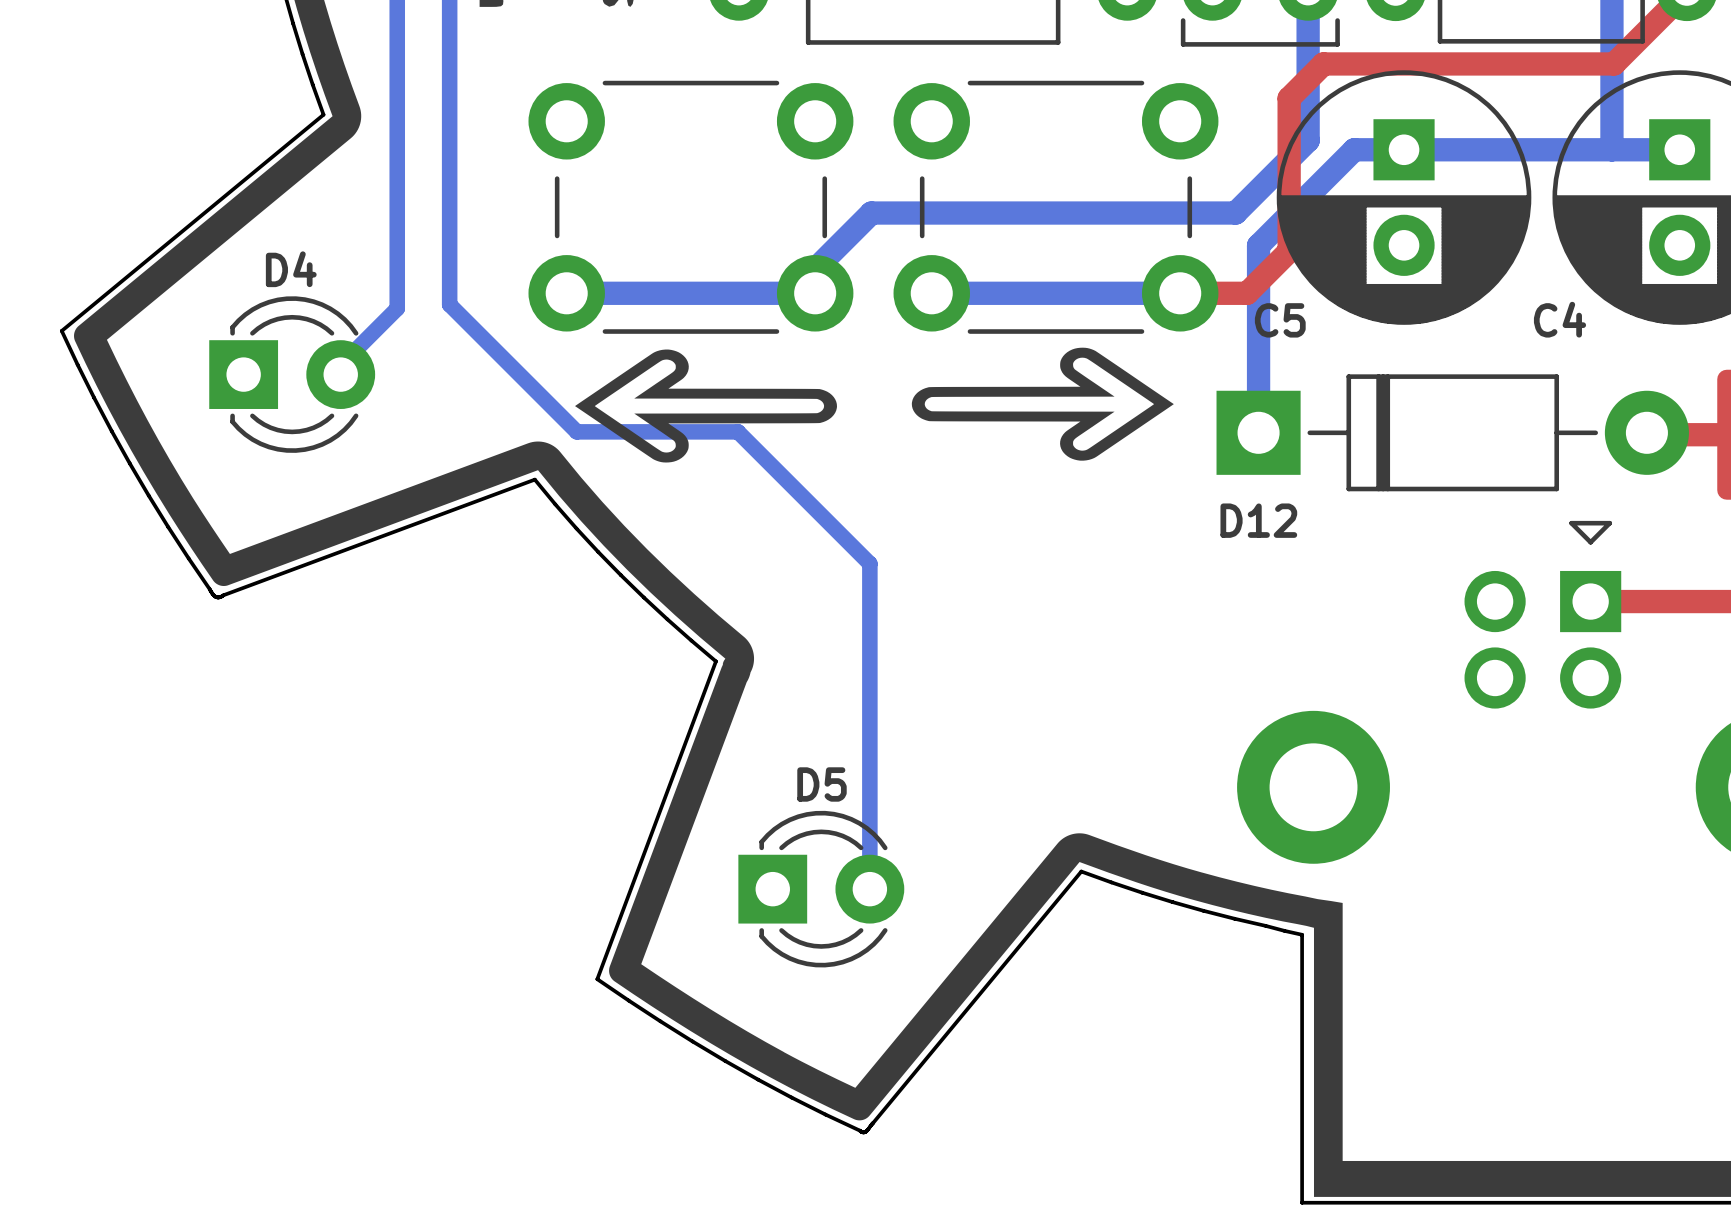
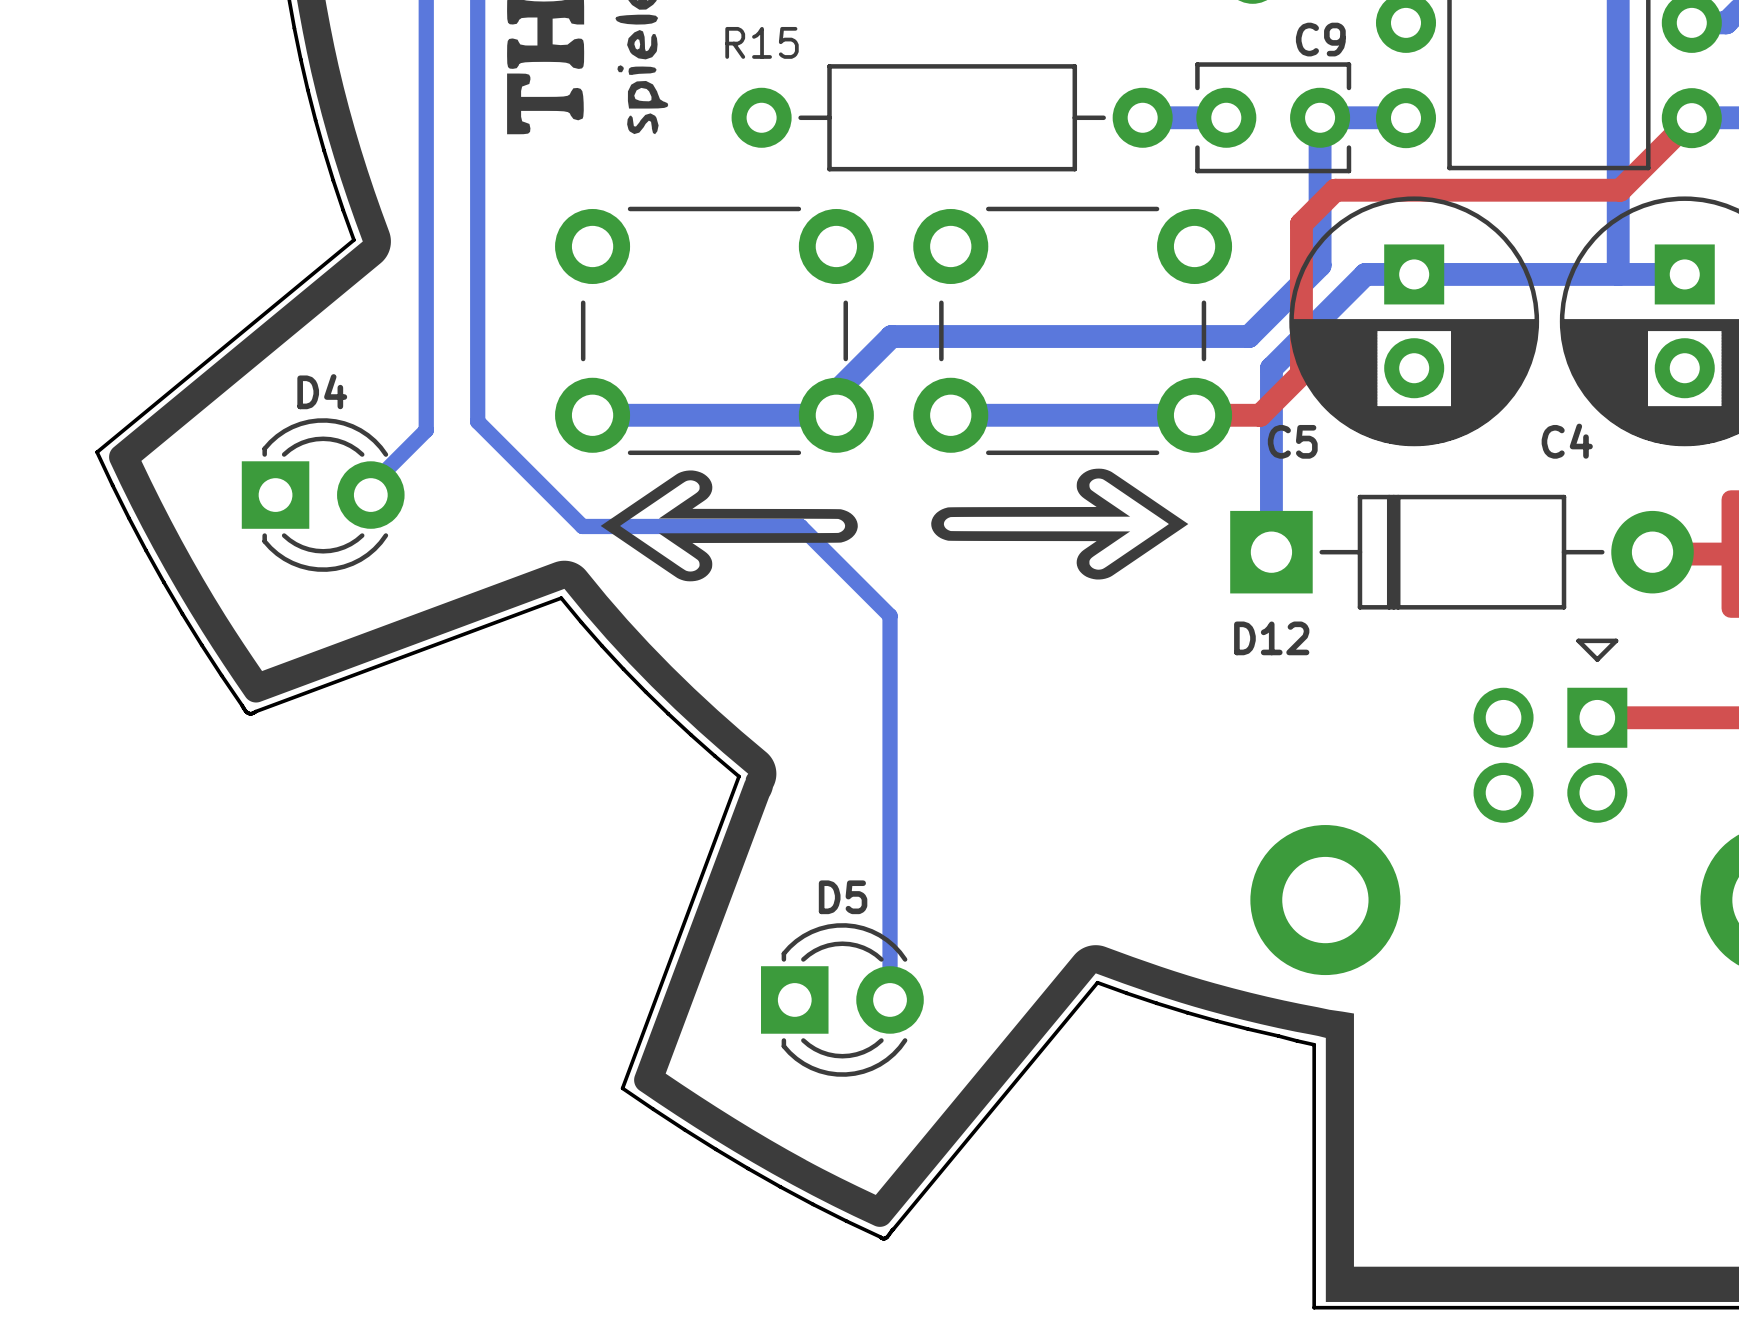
bottom track: (449, 299) (449, 304) (576, 431) (738, 431) (869, 563) -> (477, 421) (582, 526) (800, 526) (890, 615) (890, 680)

